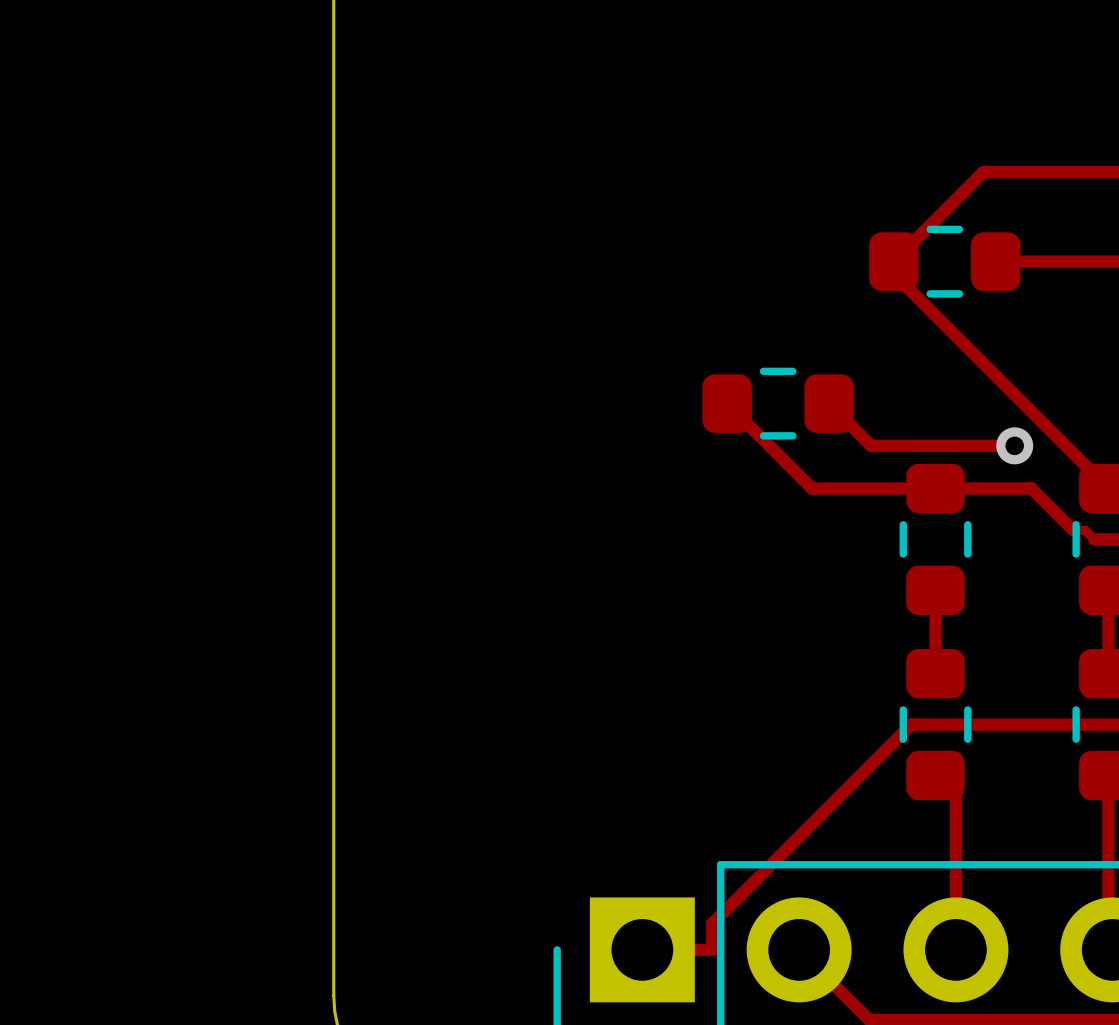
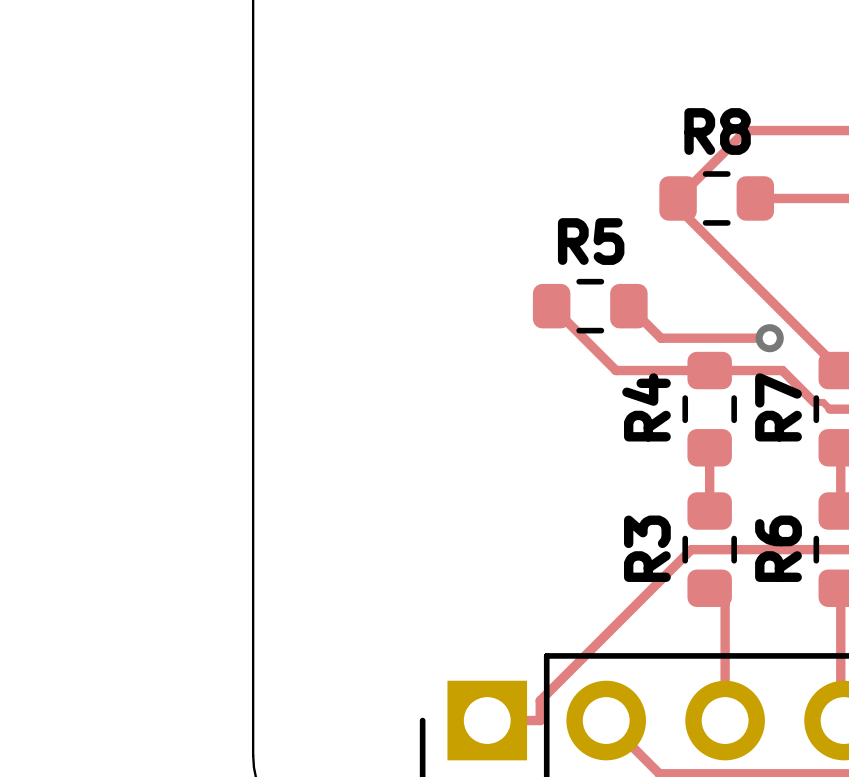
R8 name: none -> R8 (717, 131)
R5 name: none -> R5 (591, 241)
R4 name: none -> R4 (646, 407)
R7 name: none -> R7 (778, 407)
R6 name: none -> R6 (778, 548)
R3 name: none -> R3 (647, 548)

